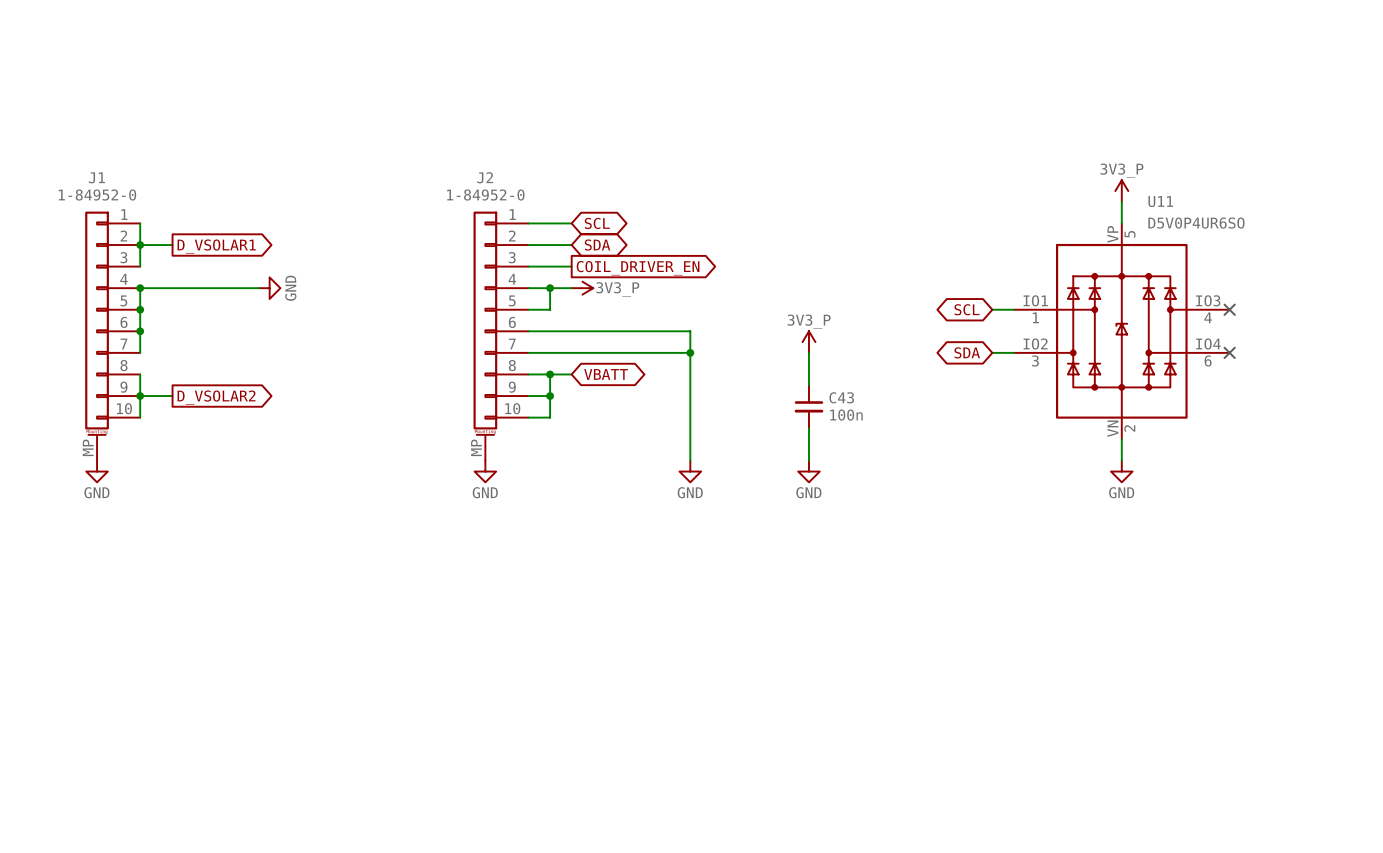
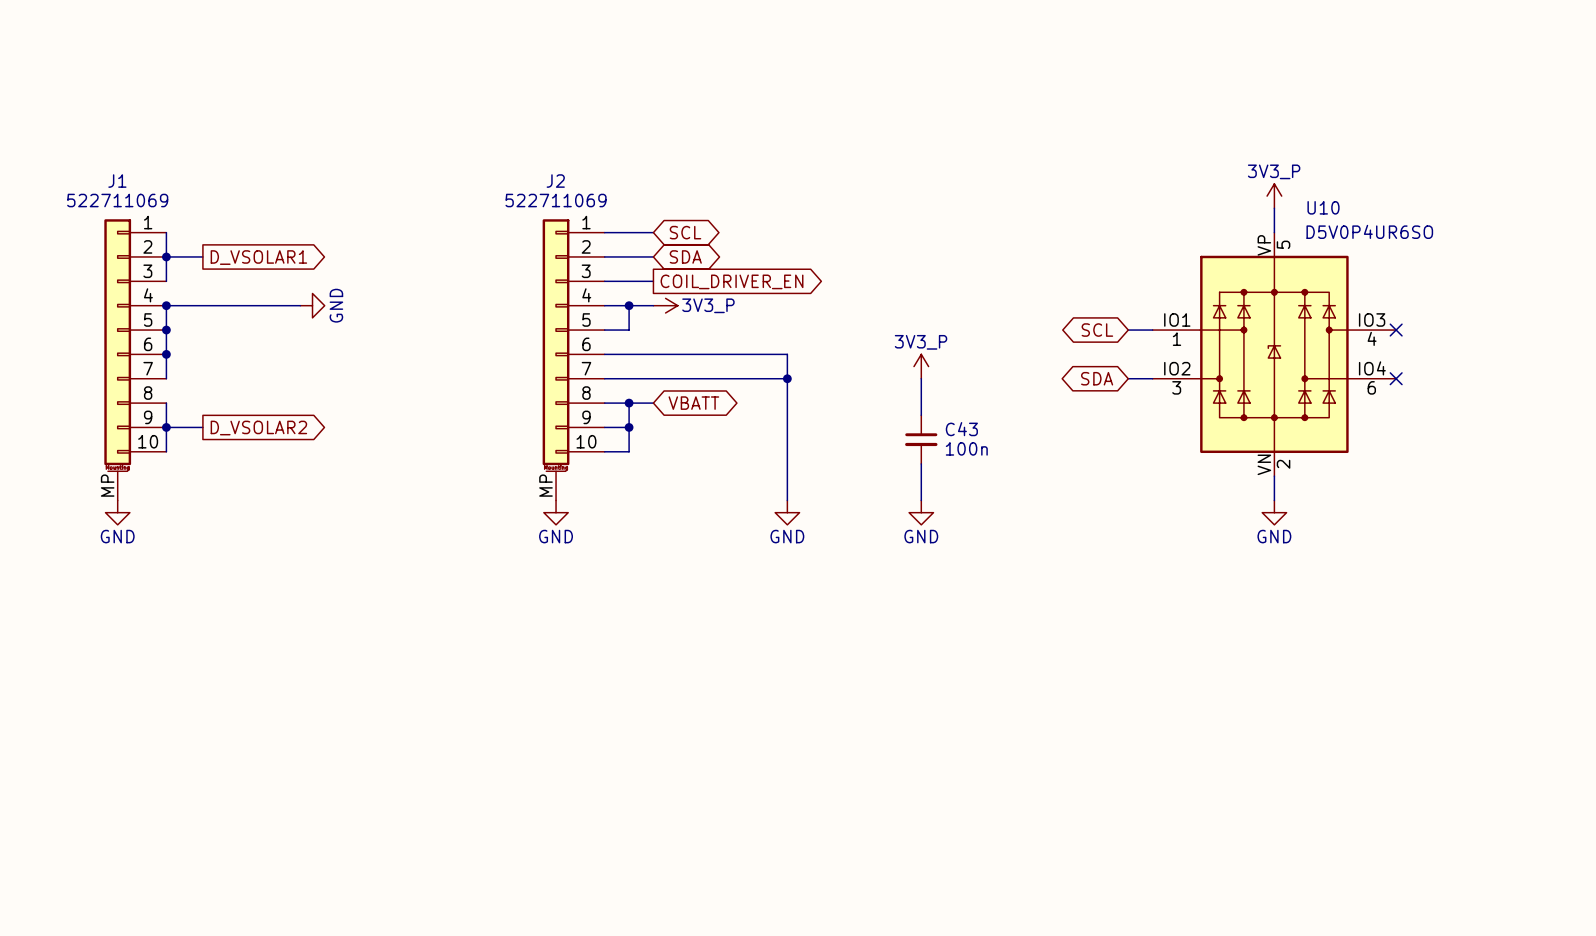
J1 value: 1-84952-0 (97, 195) -> 522711069 (117, 200)
J2 value: 1-84952-0 (485, 195) -> 522711069 (556, 200)
U11 name: U11 (1160, 201) -> U10 (1323, 207)

